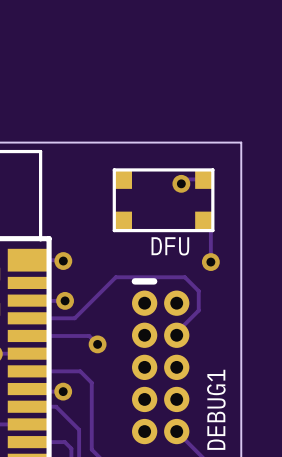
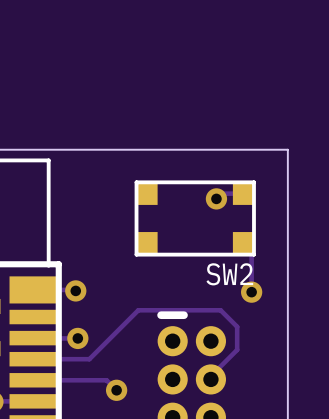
DFU name: DFU (170, 246) -> SW2 (229, 274)

